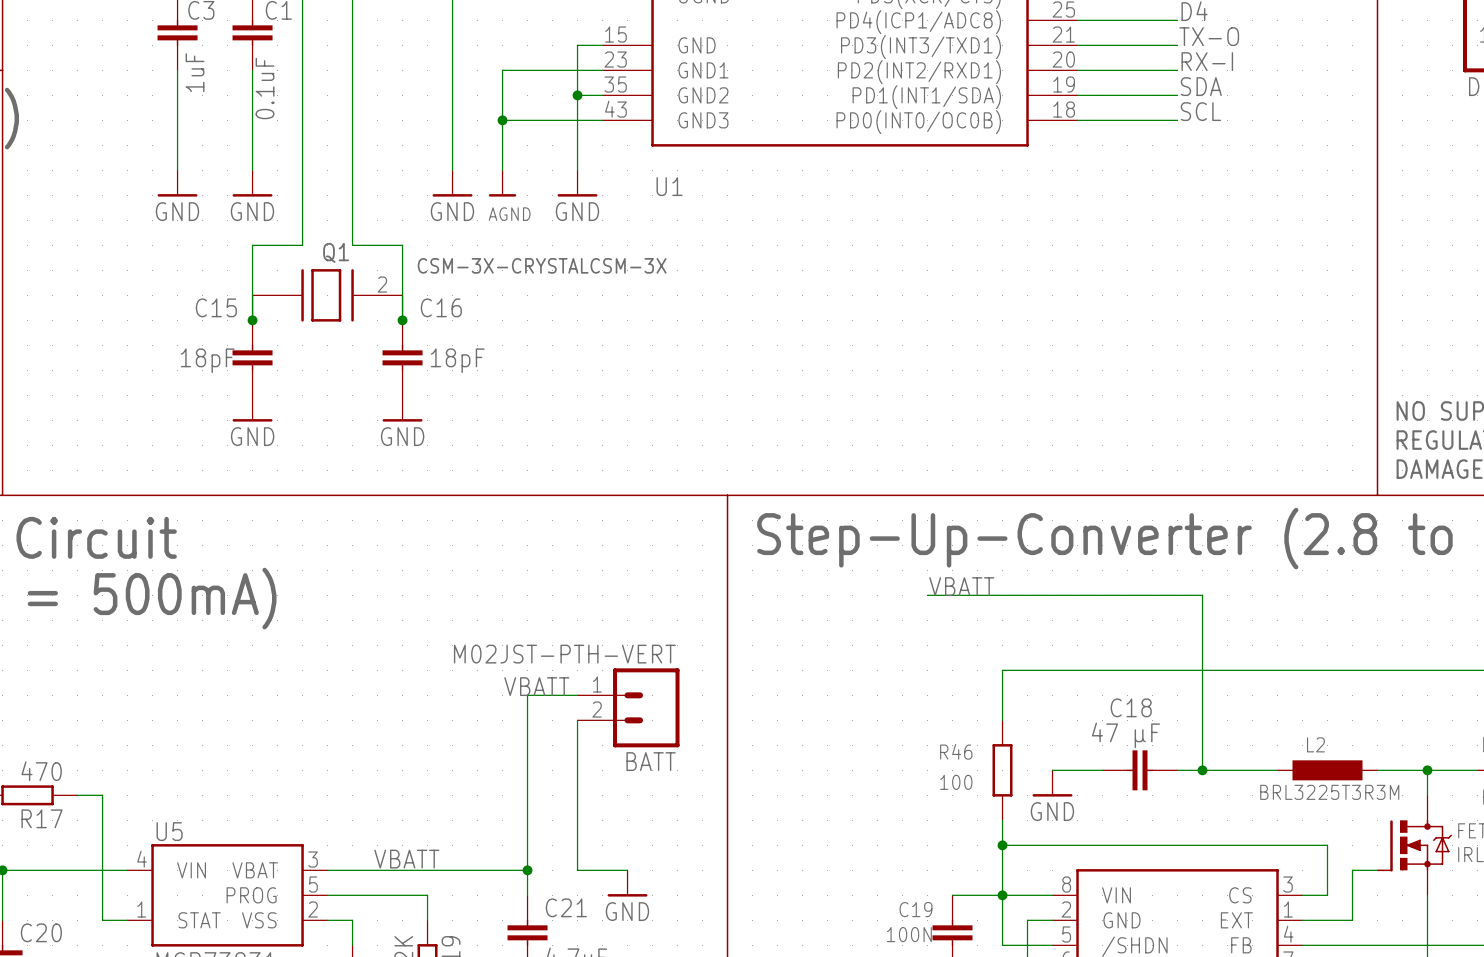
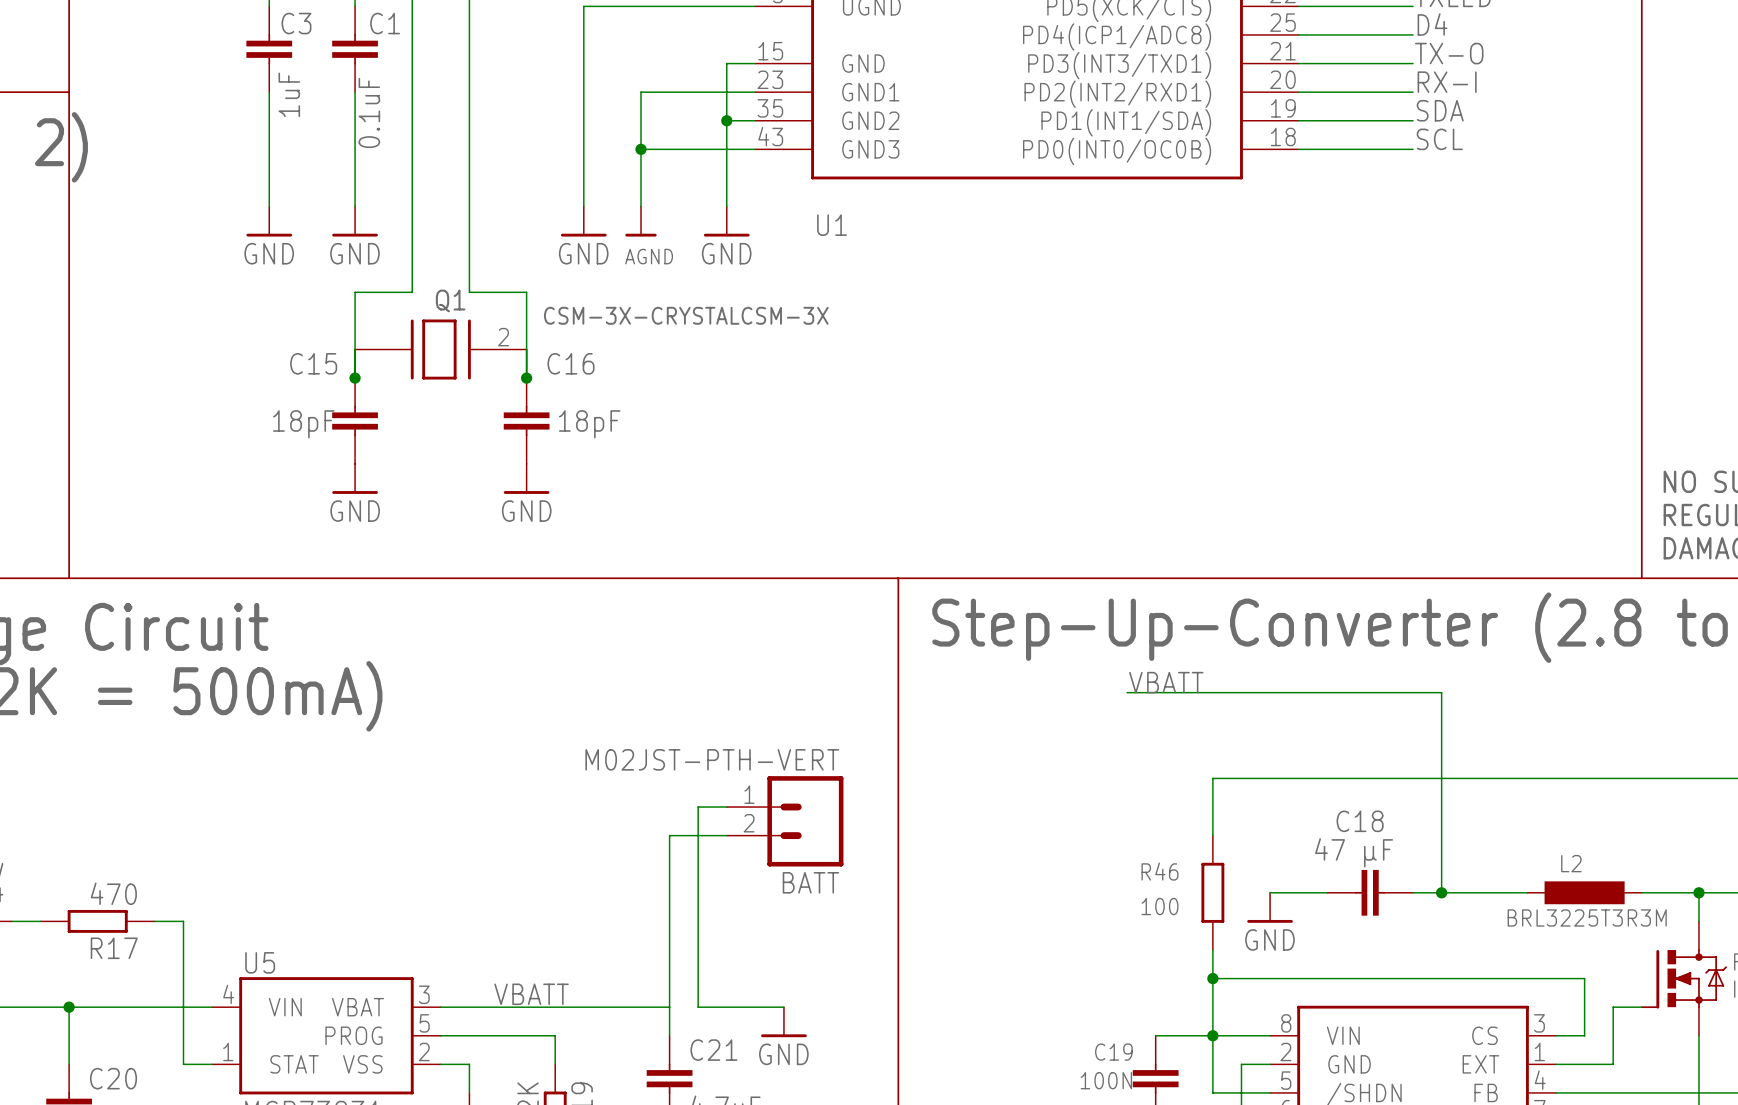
label: VBATT (536, 686) -> none
wire: (552, 695) (527, 695) (527, 720) -> (726, 835) (669, 835)
wire: (577, 720) (577, 870) -> (698, 807) (698, 1007) (726, 1007)
junction: (527, 870) -> none

